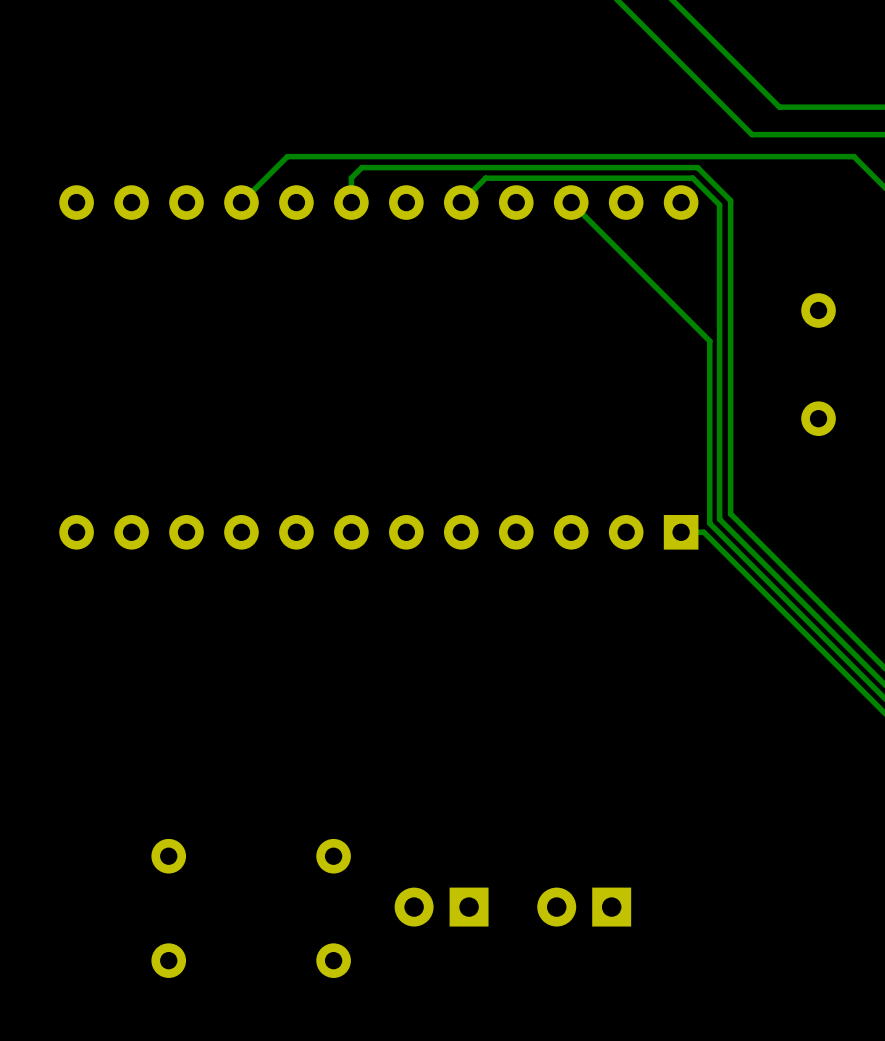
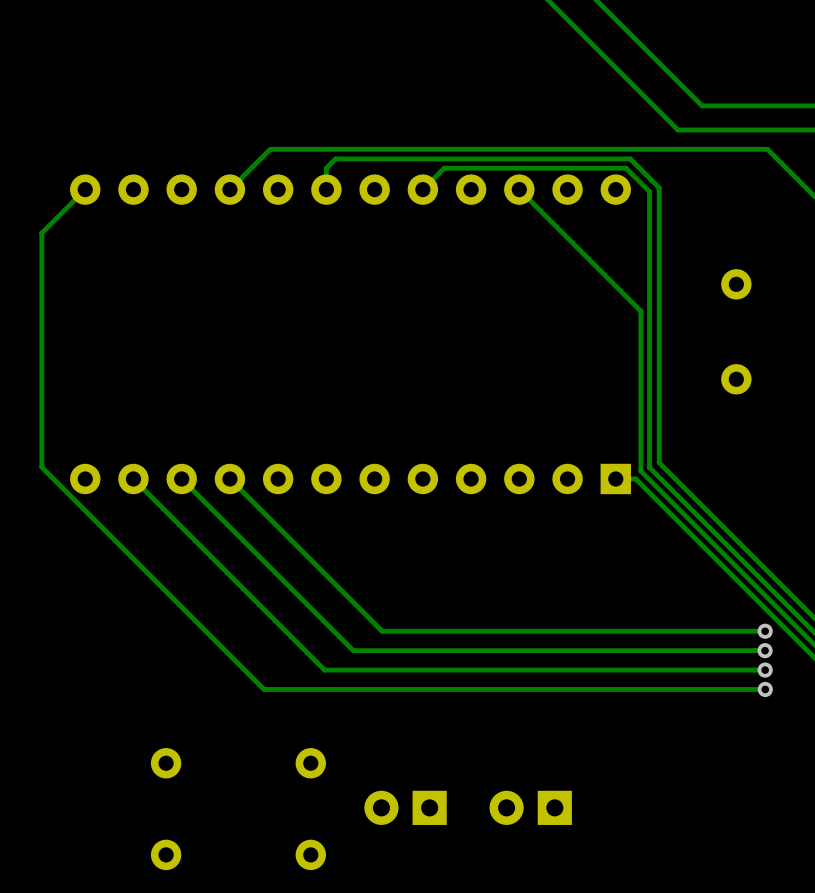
track: none -> (85, 189) (41, 233) (41, 467) (264, 689) (765, 689)
track: none -> (133, 478) (324, 670) (765, 670)
track: none -> (181, 478) (353, 650) (765, 650)
track: none -> (229, 478) (382, 631) (765, 631)
via: none -> (765, 631)
via: none -> (765, 650)
via: none -> (765, 670)
via: none -> (765, 689)

